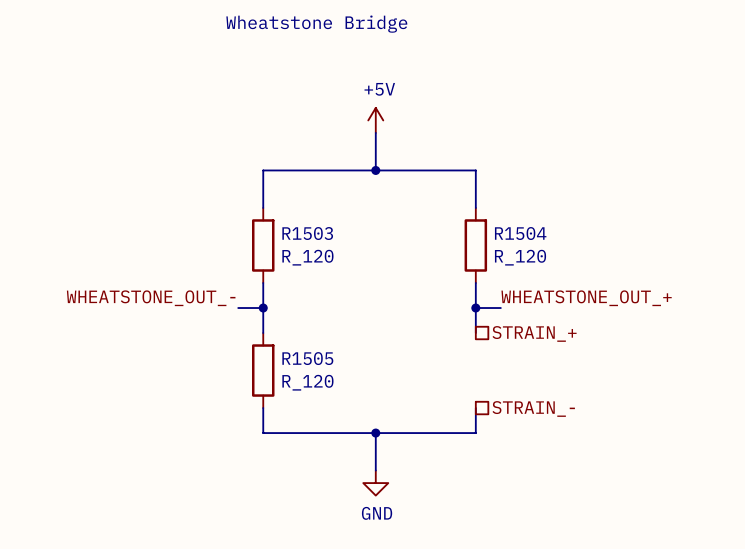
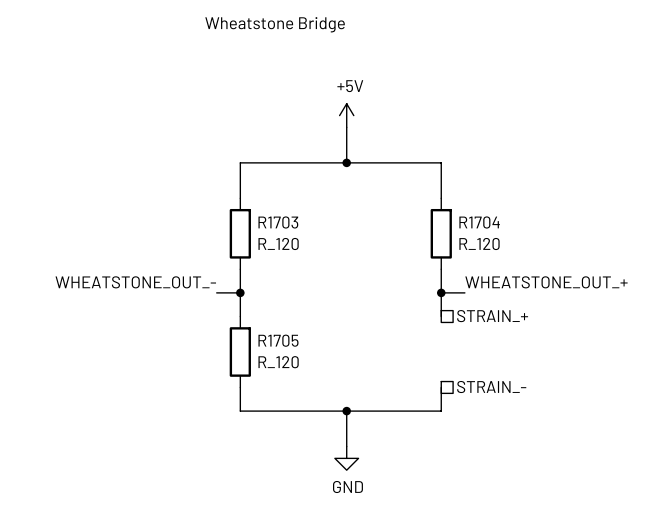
R1503 name: R1503 (307, 233) -> R1703 (278, 222)
R1504 name: R1504 (520, 233) -> R1704 (479, 222)
R1505 name: R1505 (307, 358) -> R1705 (278, 340)

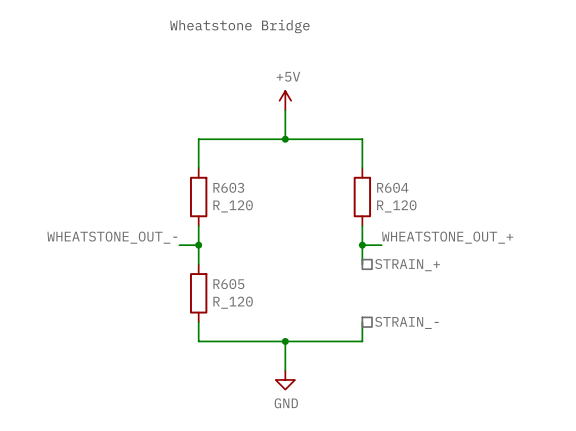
R1703 name: R1703 (278, 222) -> R603 (228, 187)
R1704 name: R1704 (479, 222) -> R604 (392, 187)
R1705 name: R1705 (278, 340) -> R605 (228, 284)

